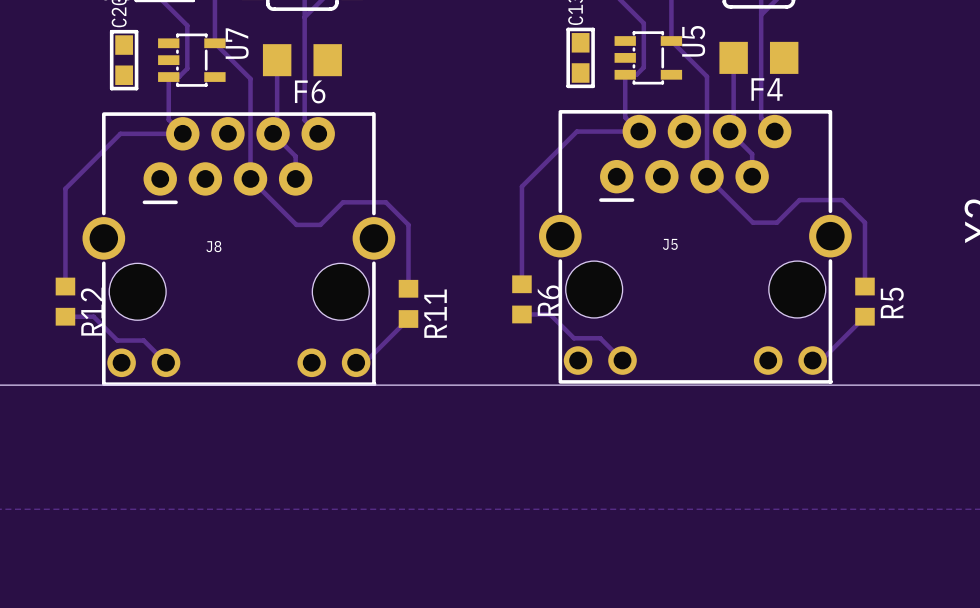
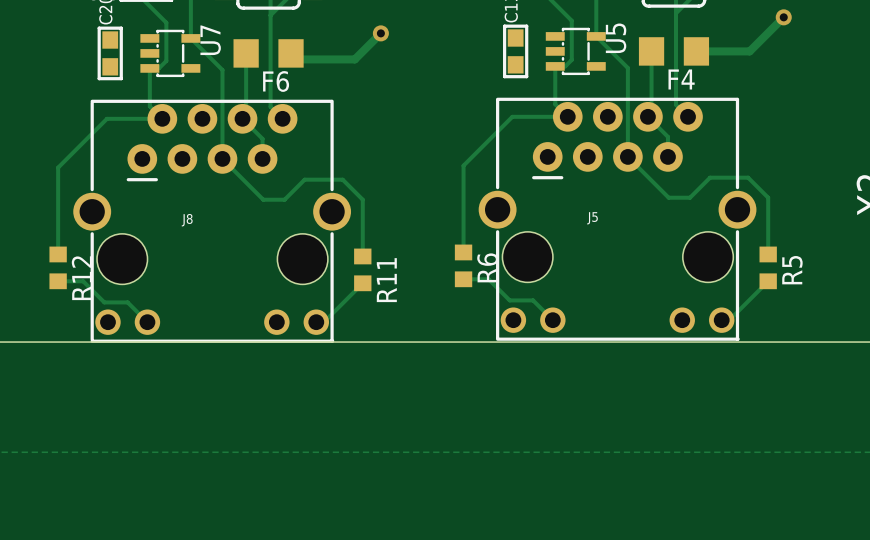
track: none -> (783, 17) (749, 51) (696, 51)
via: none -> (783, 17)
track: none -> (380, 33) (354, 59) (296, 59) (291, 53)
via: none -> (380, 33)

